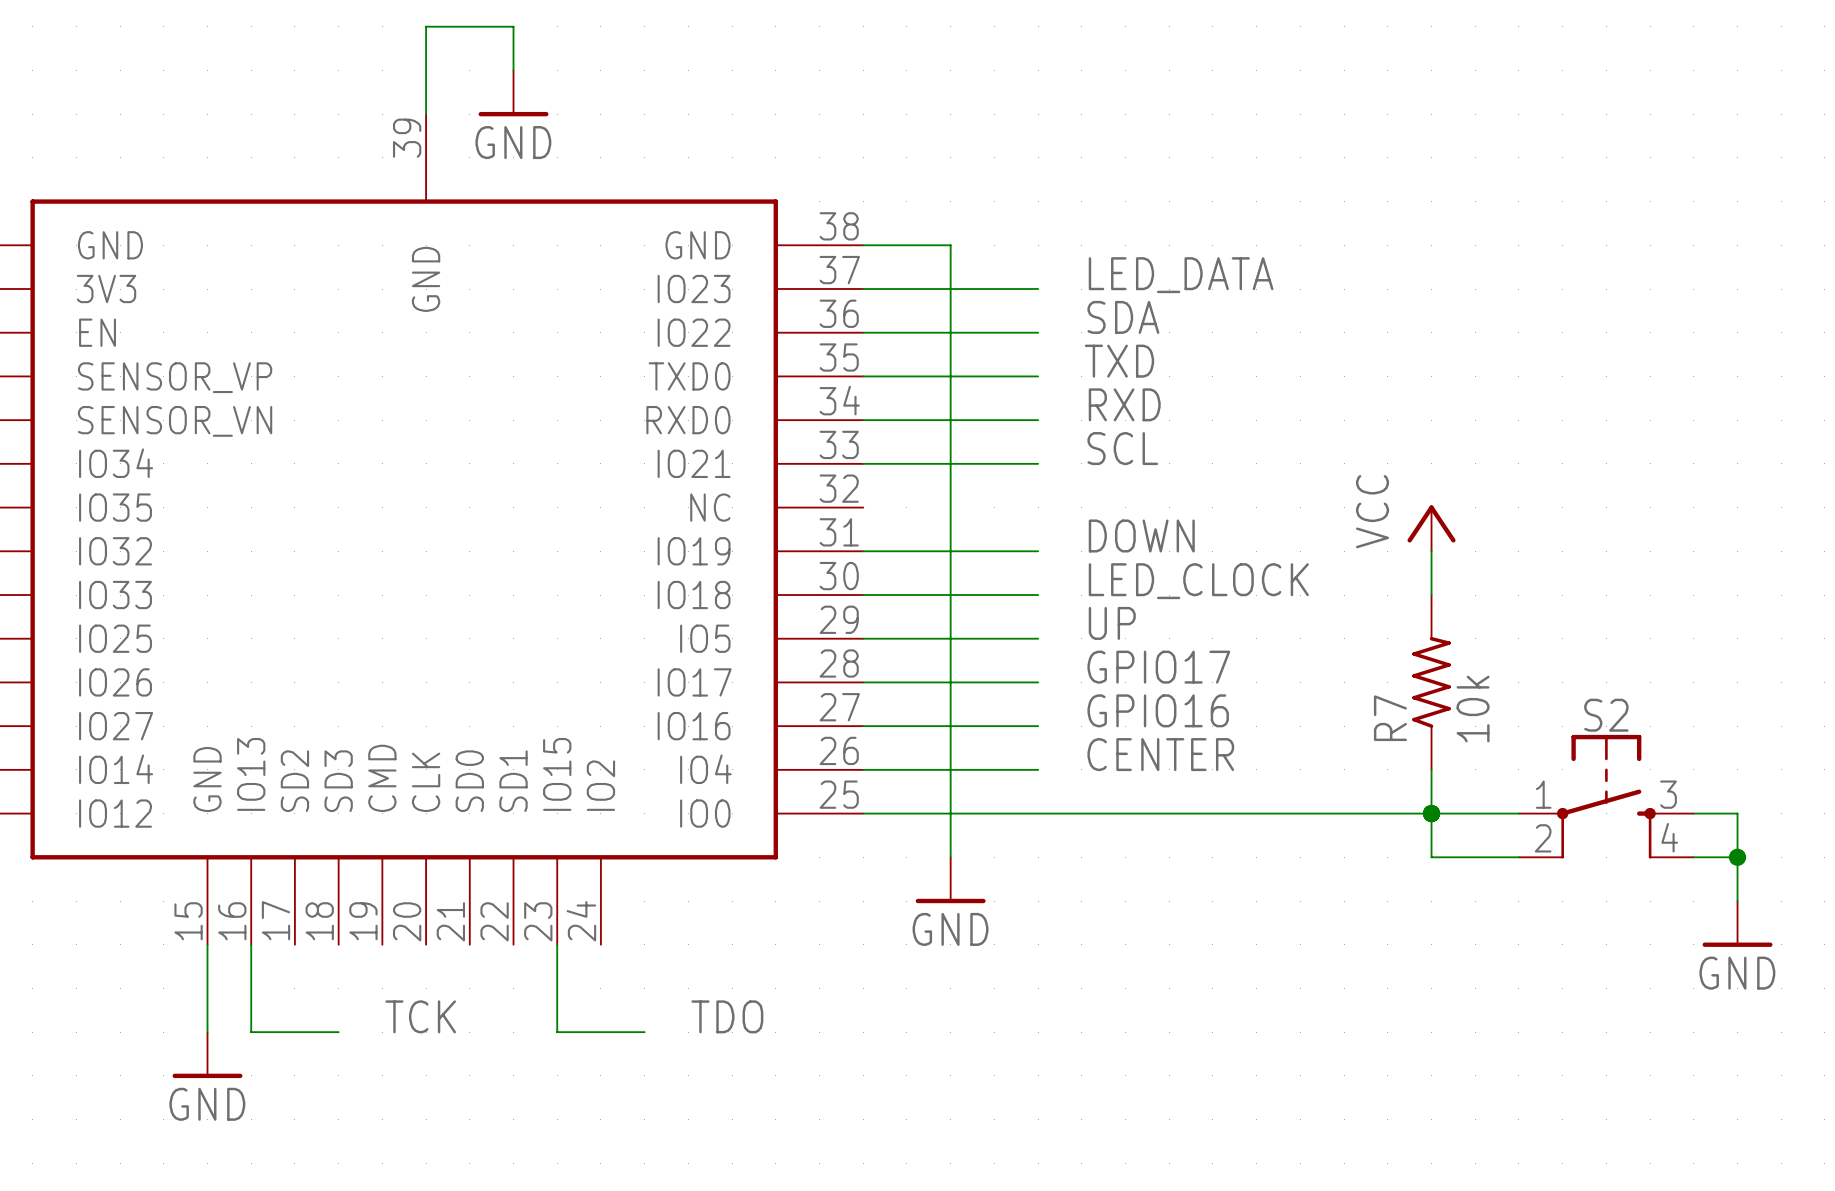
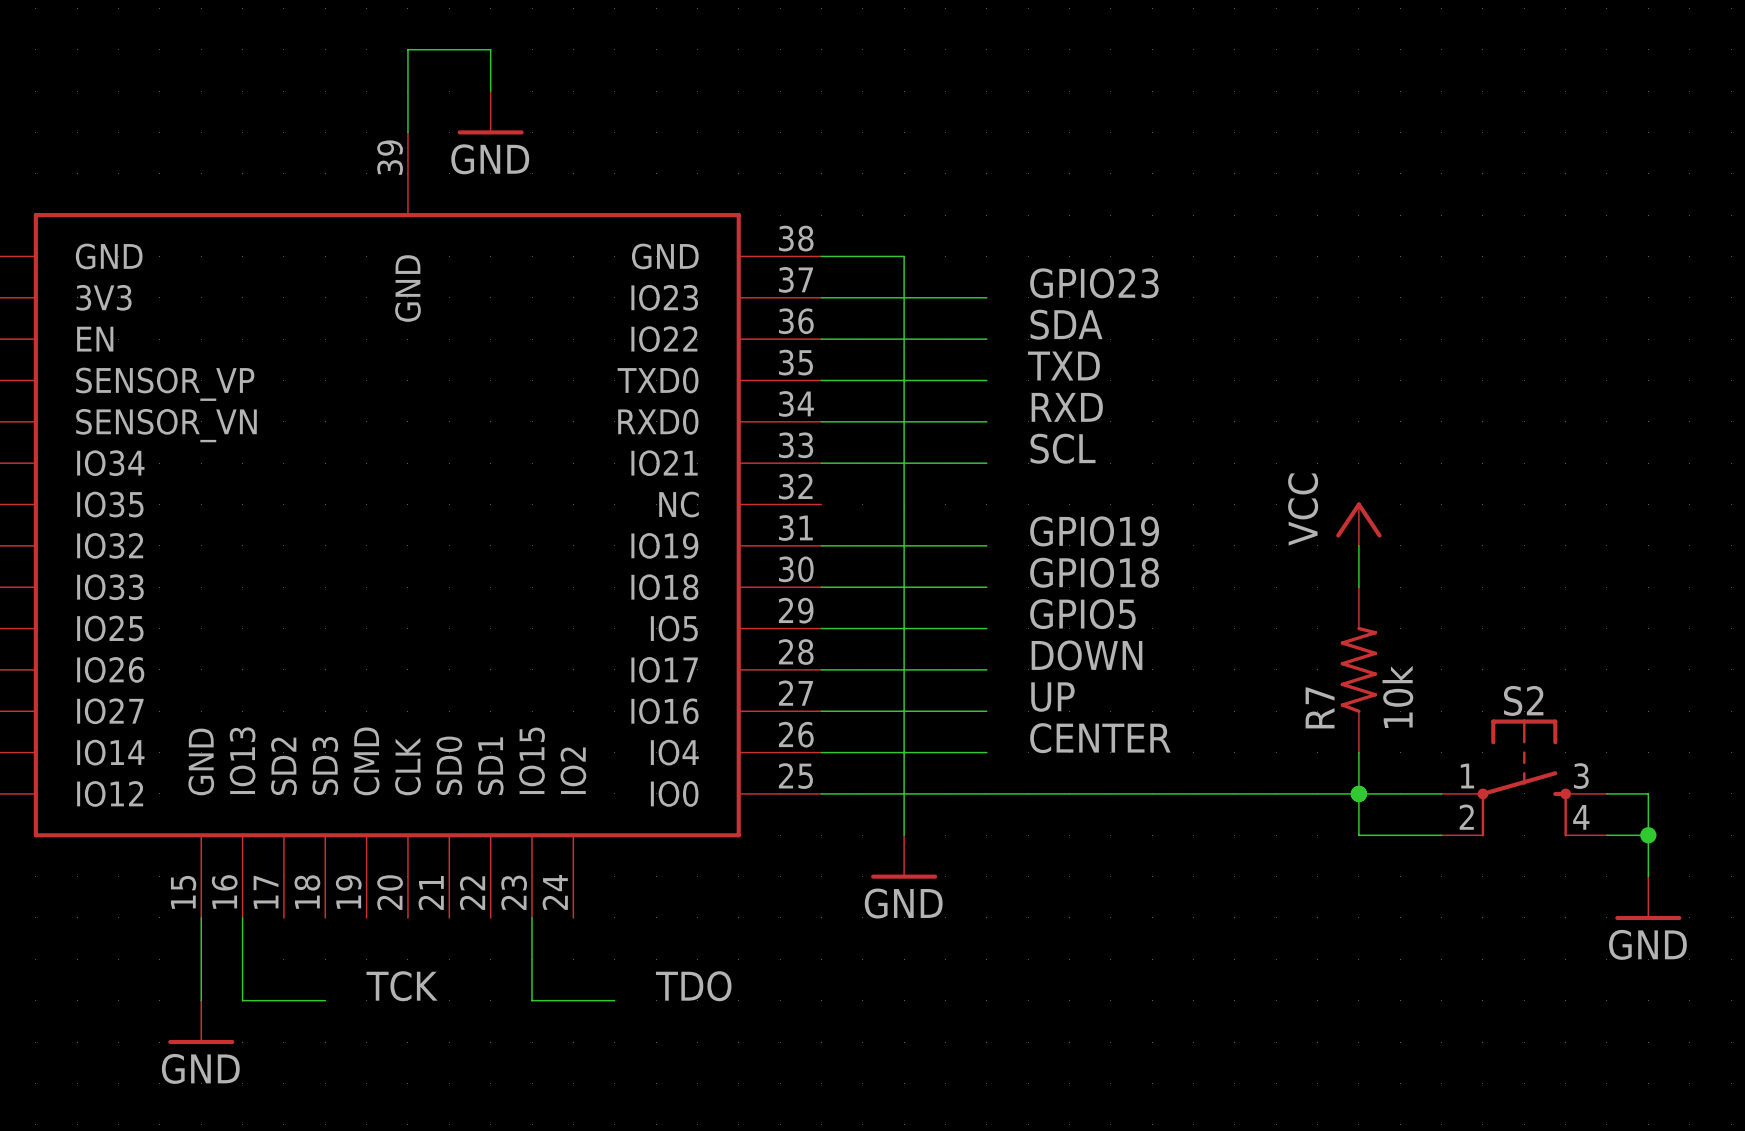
label: LED_DATA (1181, 275) -> GPIO23 (1094, 283)
label: DOWN (1141, 535) -> GPIO19 (1094, 531)
label: LED_CLOCK (1198, 581) -> GPIO18 (1094, 572)
label: UP (1112, 623) -> GPIO5 (1082, 614)
label: GPIO17 (1158, 667) -> DOWN (1086, 655)
label: GPIO16 (1158, 710) -> UP (1052, 697)

